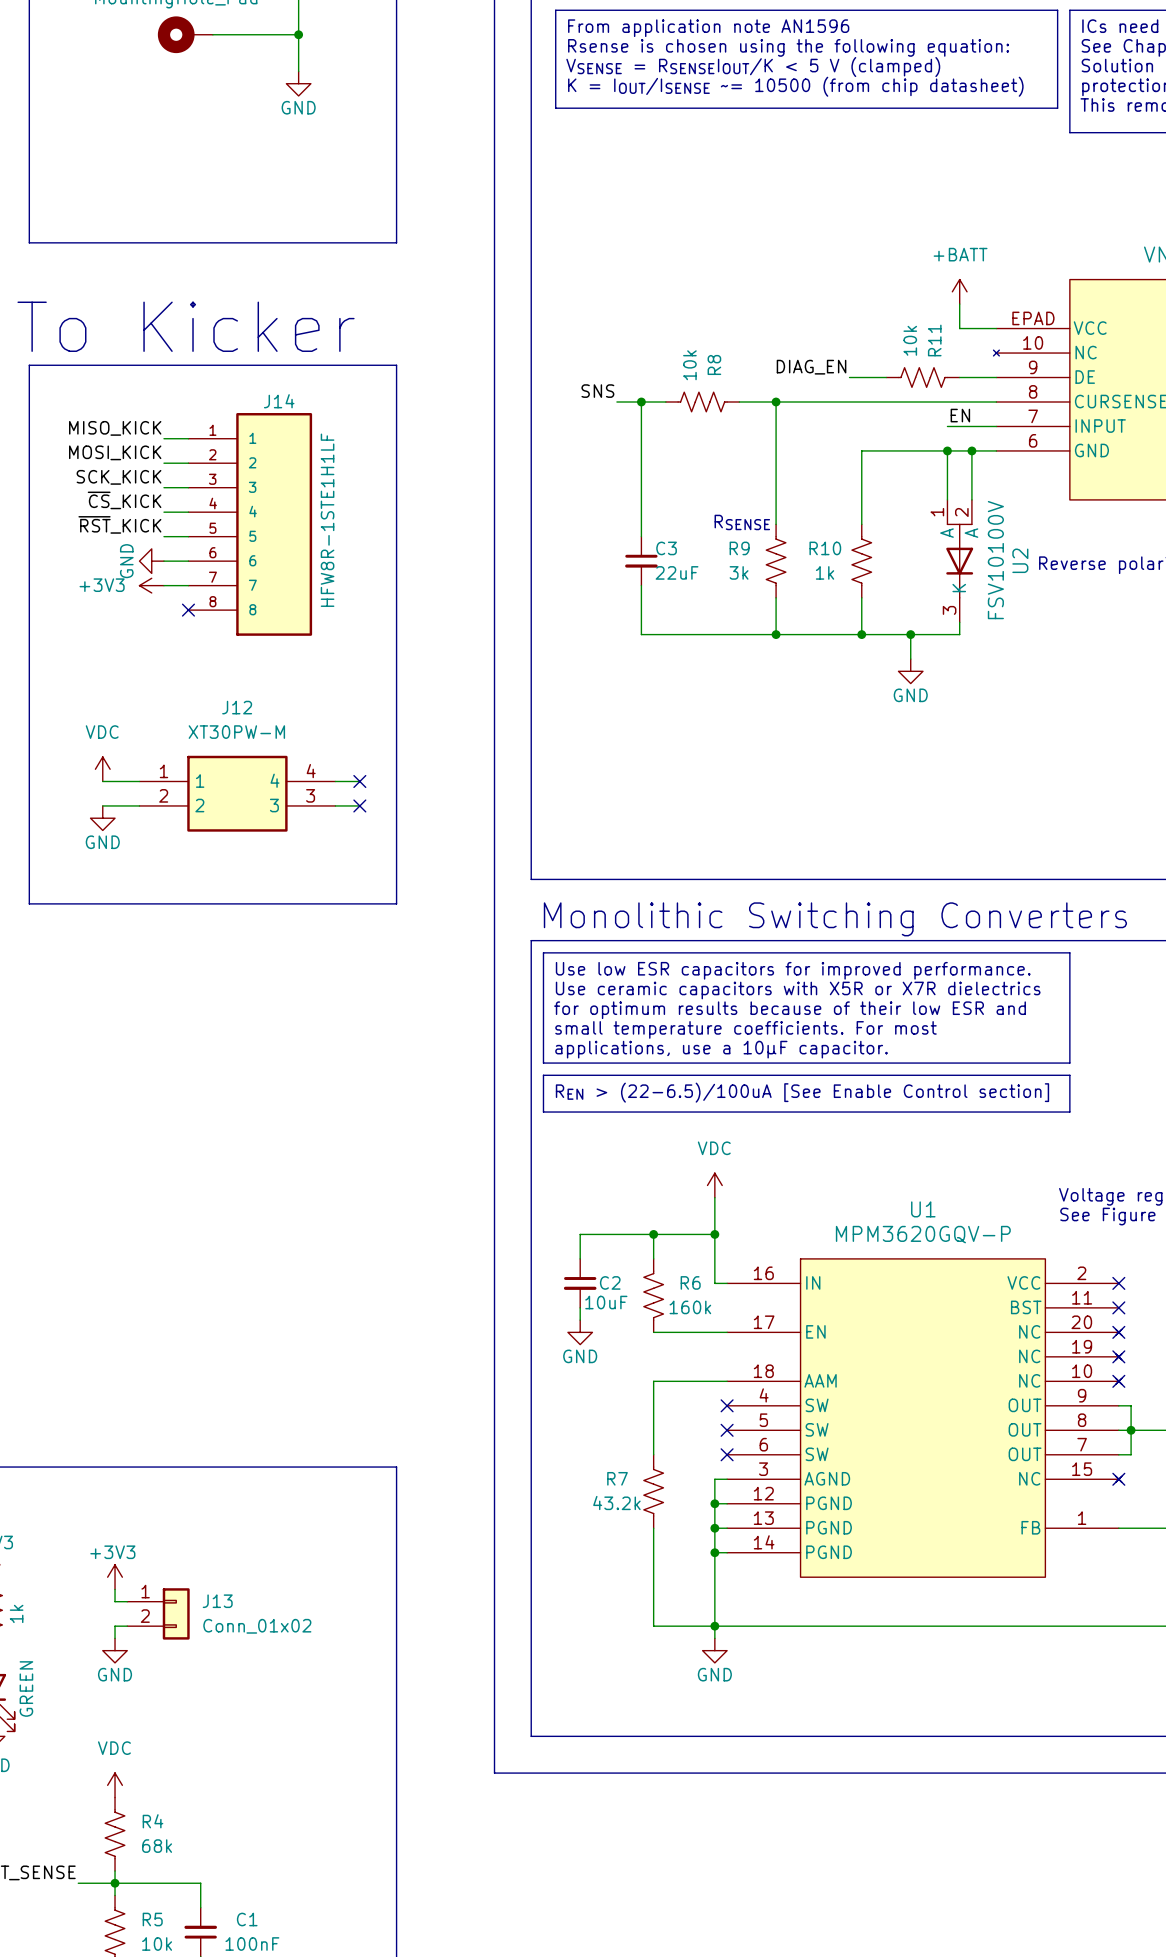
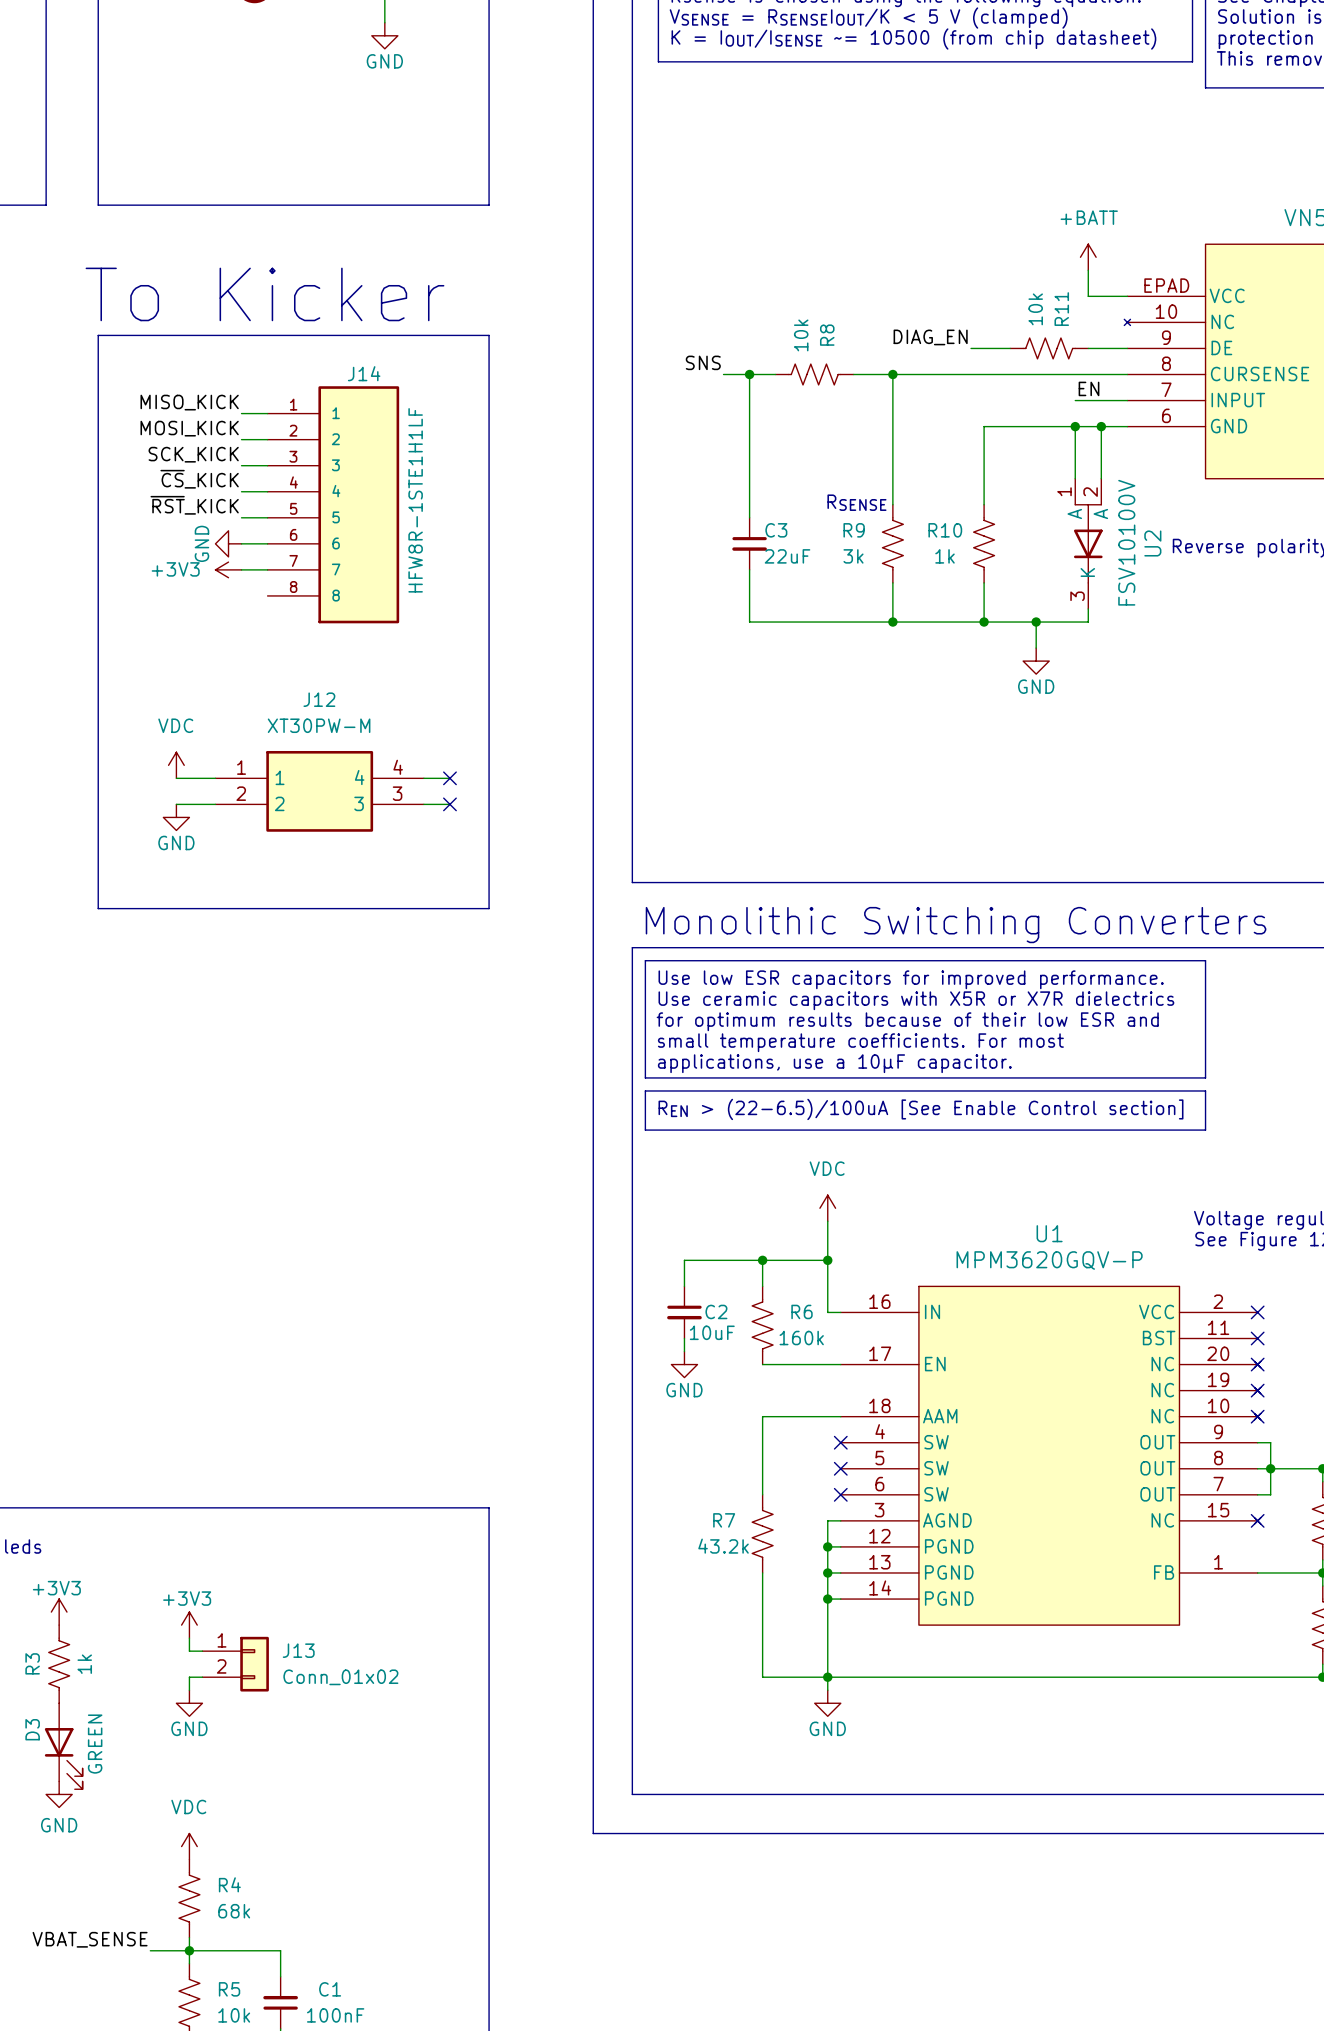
no-connect mark: (188, 610) -> none

